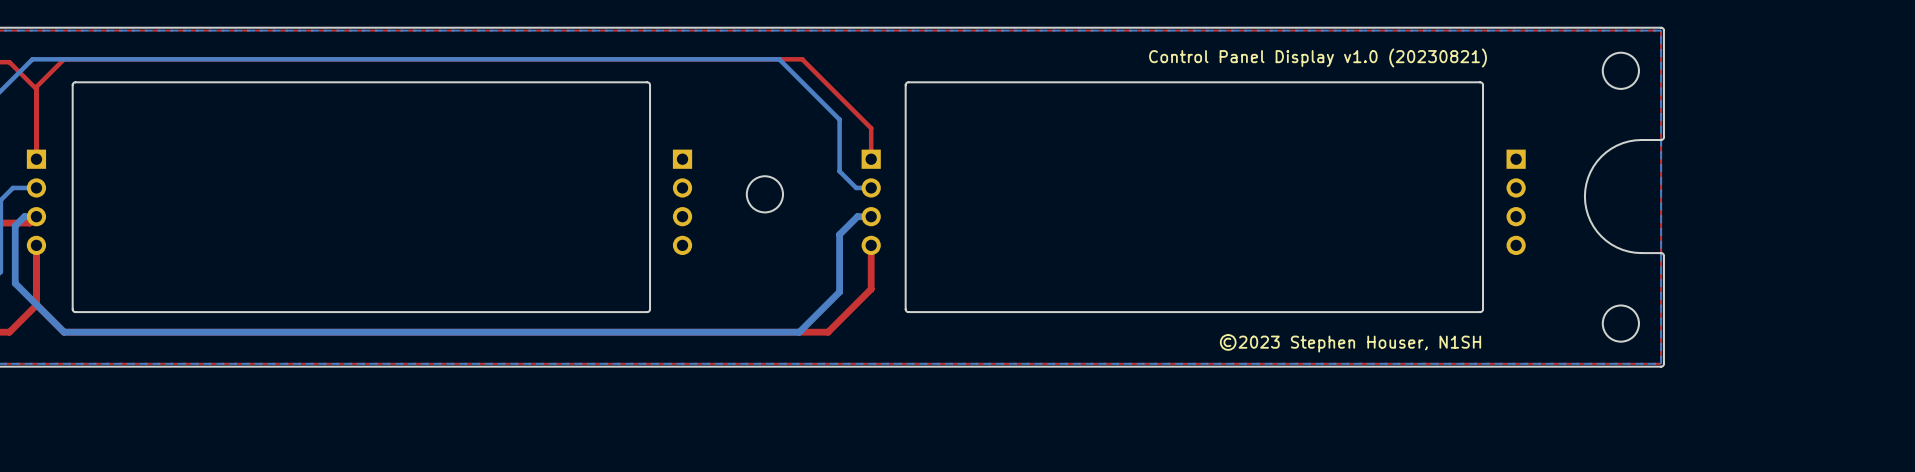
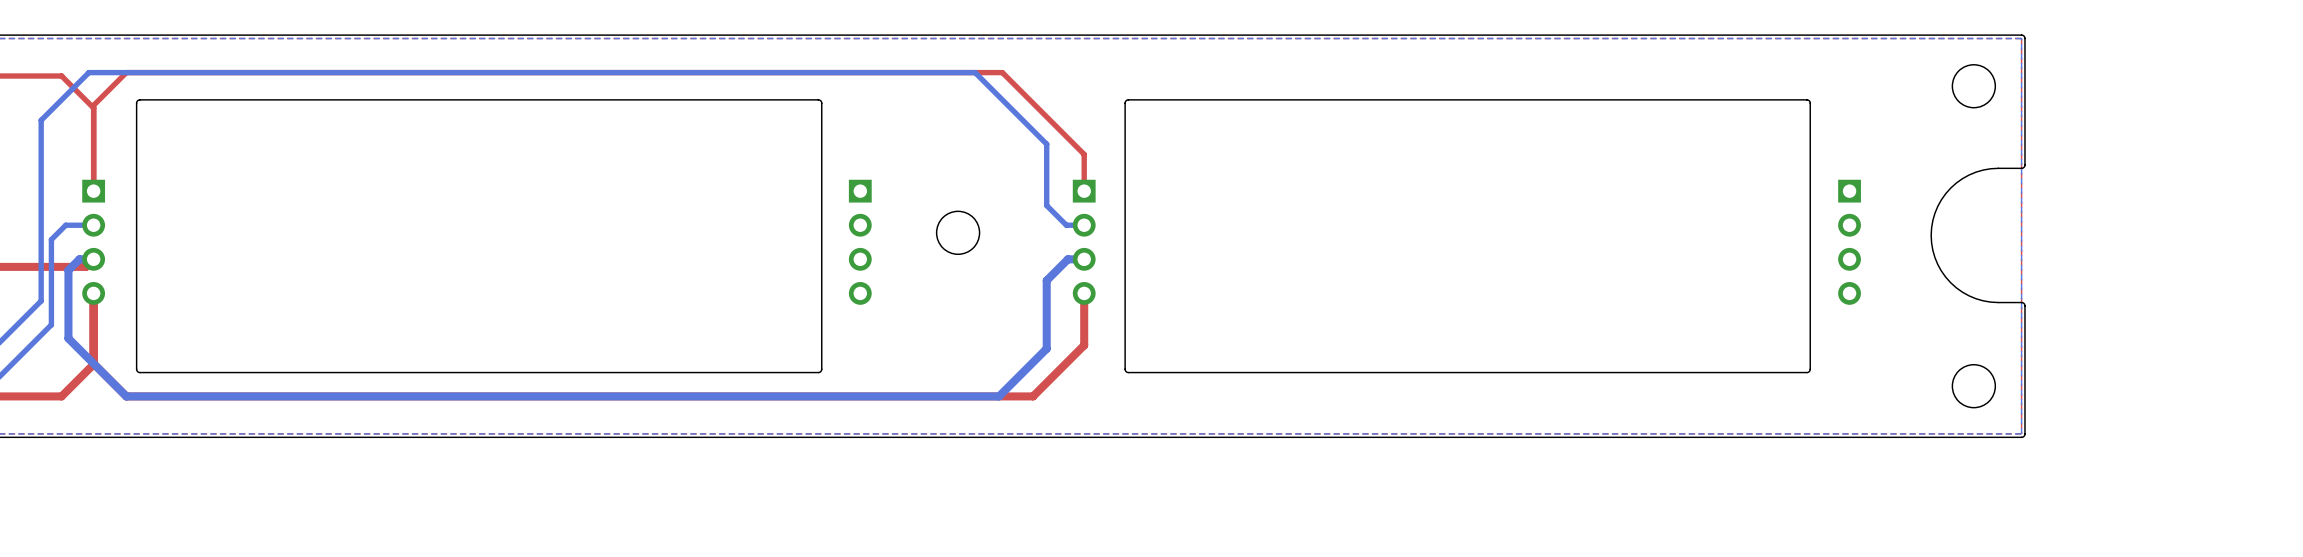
text: Control Panel Display v1.0 (20230821) (1318, 57) -> none
text: ©2023 Stephen Houser, N1SH (1350, 343) -> none

